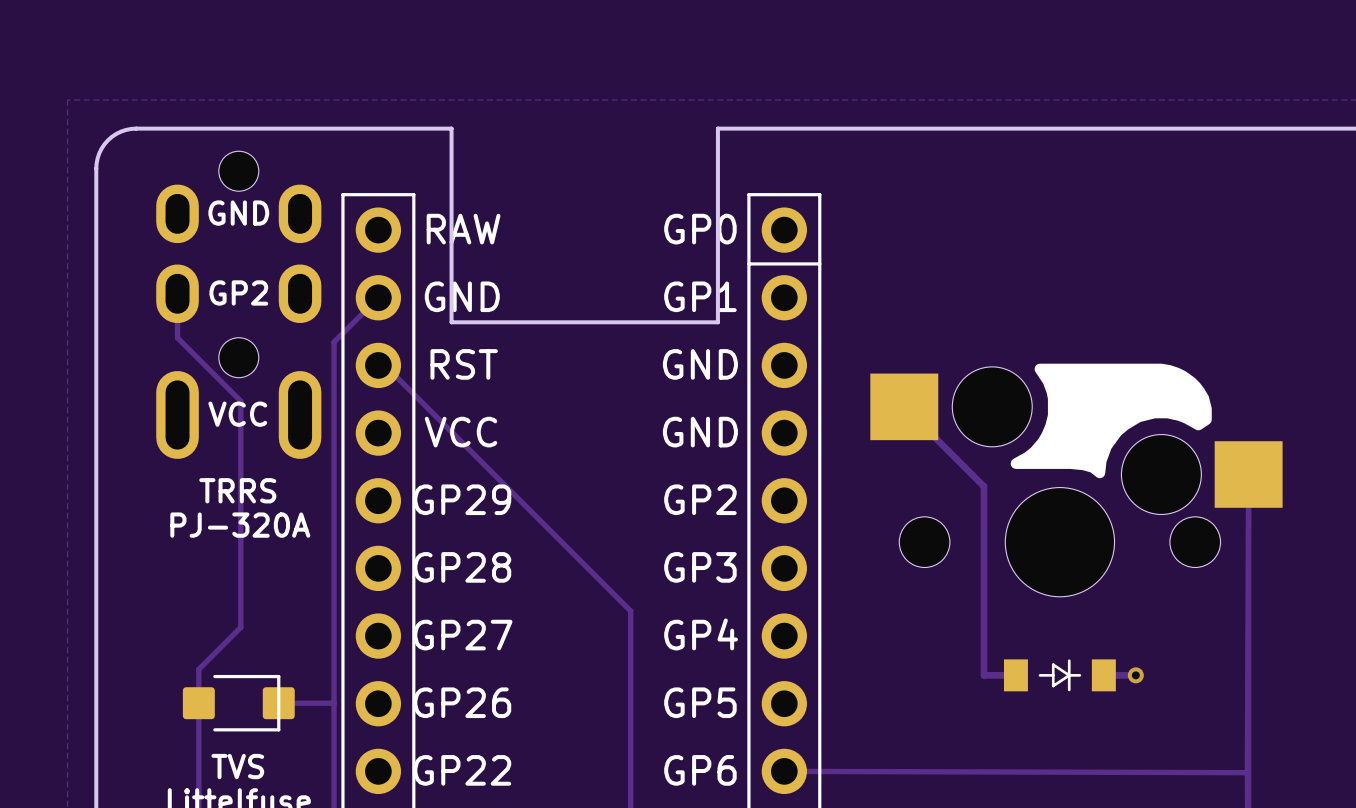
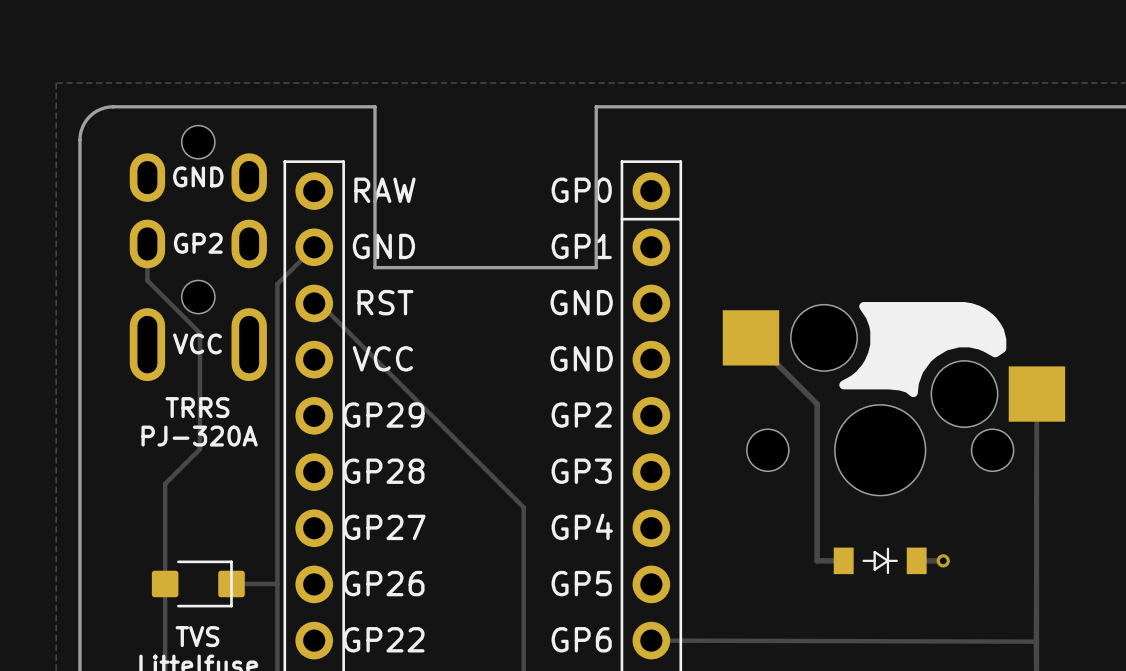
track: (240, 540) (240, 627) (198, 669) -> (199, 449) (165, 483) (165, 555)

